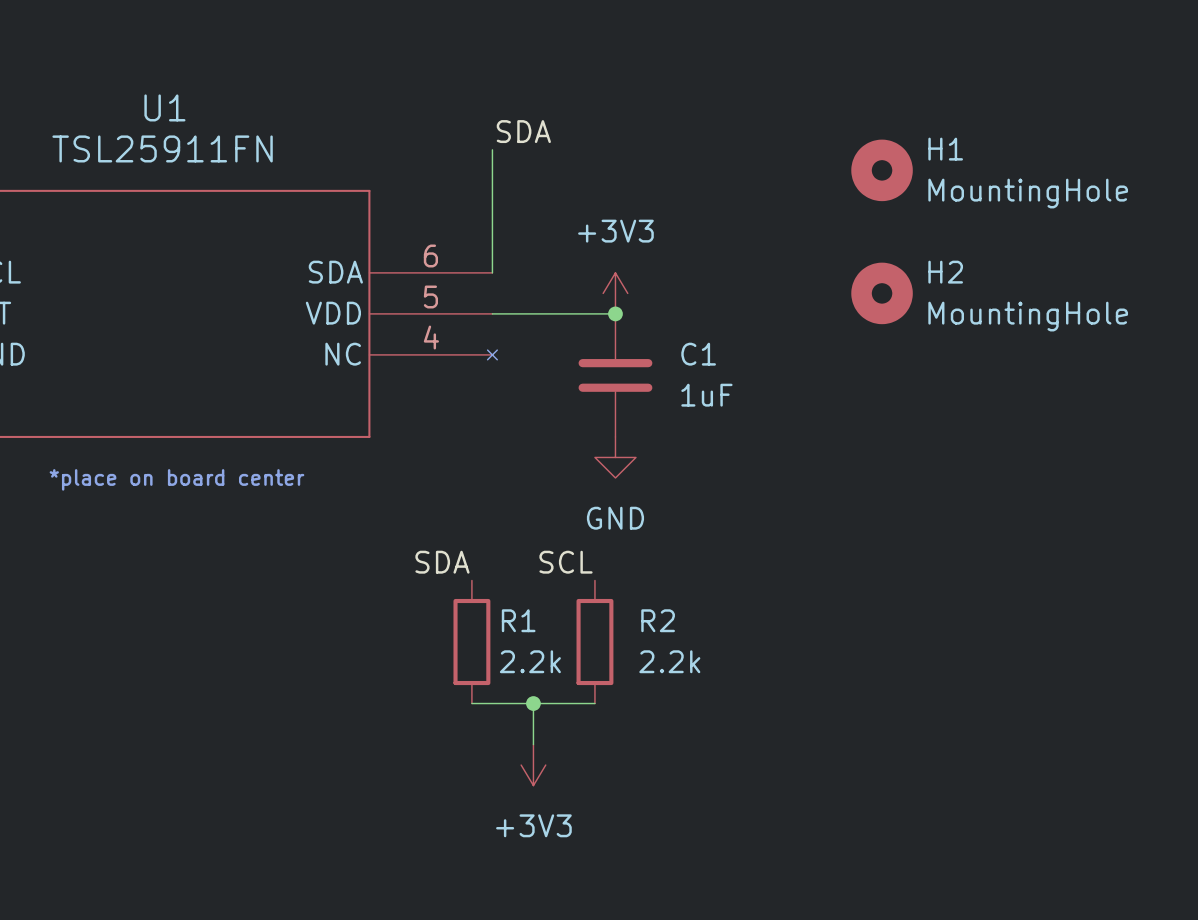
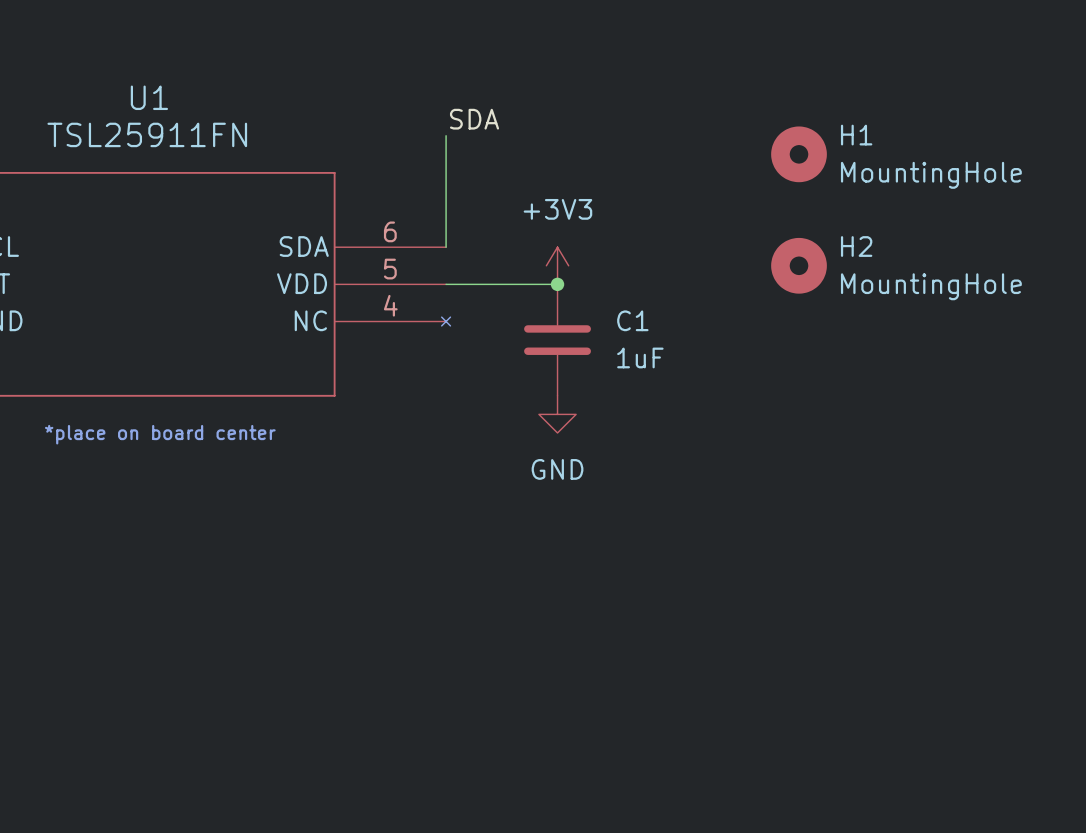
label: SDA (442, 562) -> none
label: SCL (566, 562) -> none
R1: 2.2k (471, 642) -> none
R2: 2.2k (594, 642) -> none
wire: (471, 703) (594, 703) -> none
wire: (533, 703) (533, 744) -> none
junction: (533, 703) -> none
power symbol: +3V3 (533, 765) -> none

